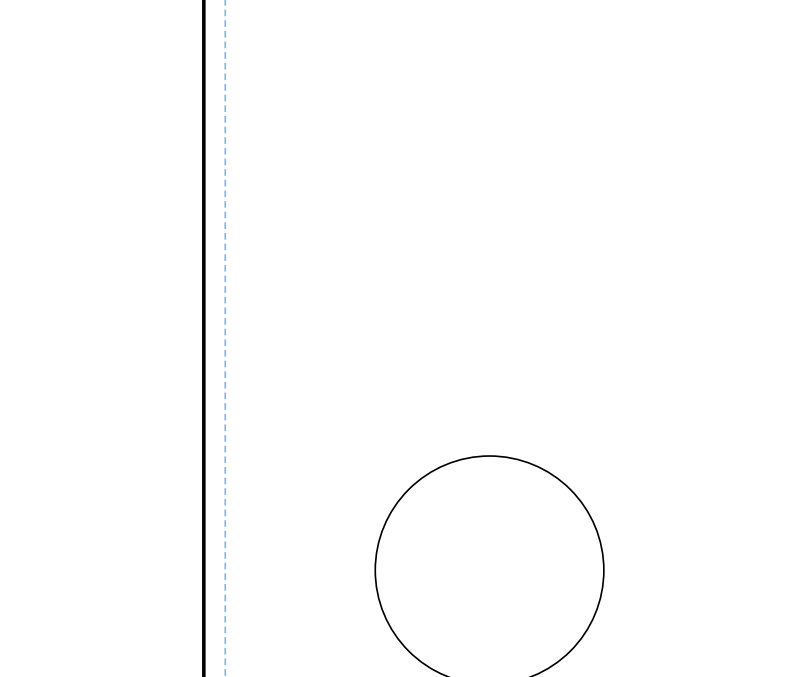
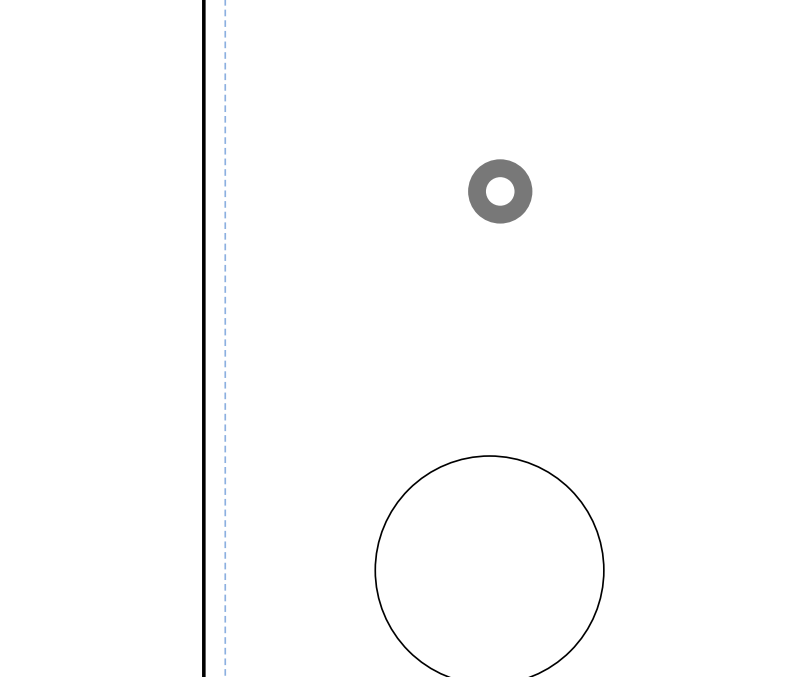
via: none -> (500, 191)

